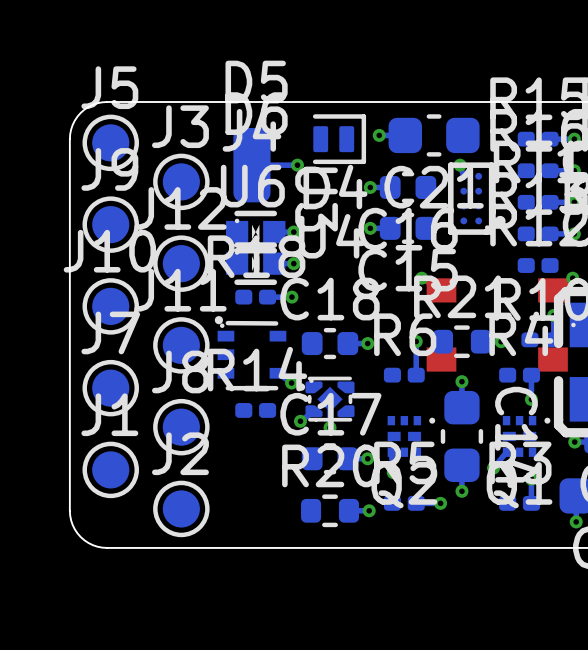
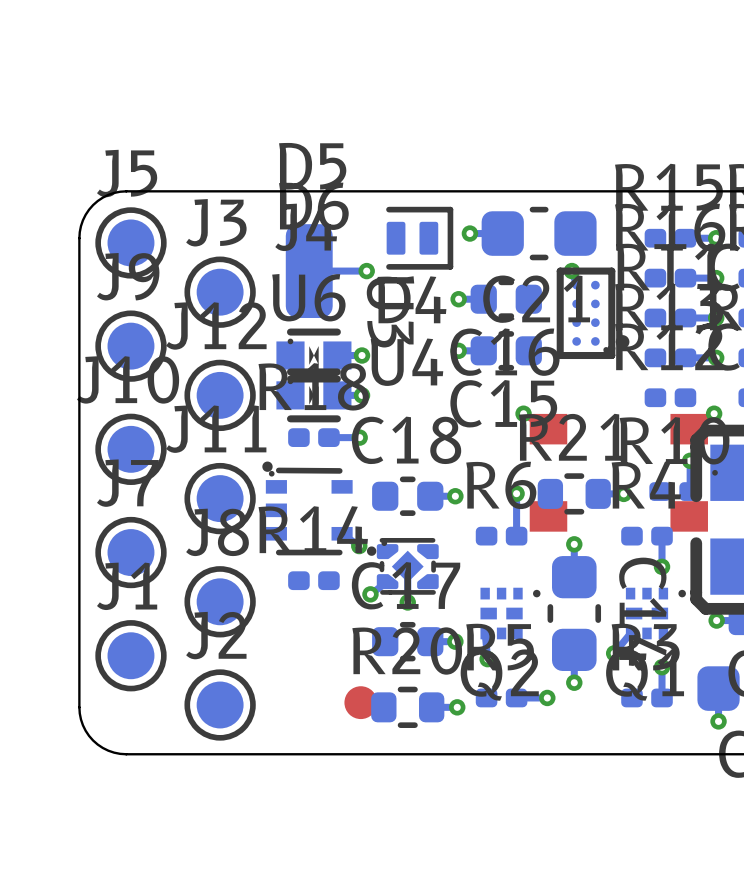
part: none -> (360, 702)

